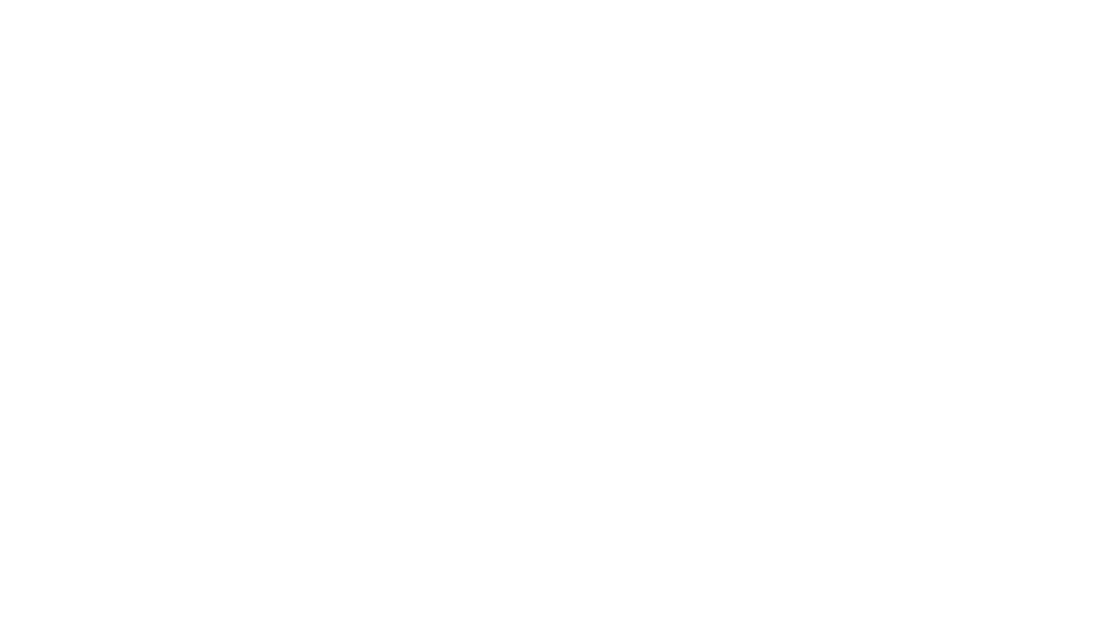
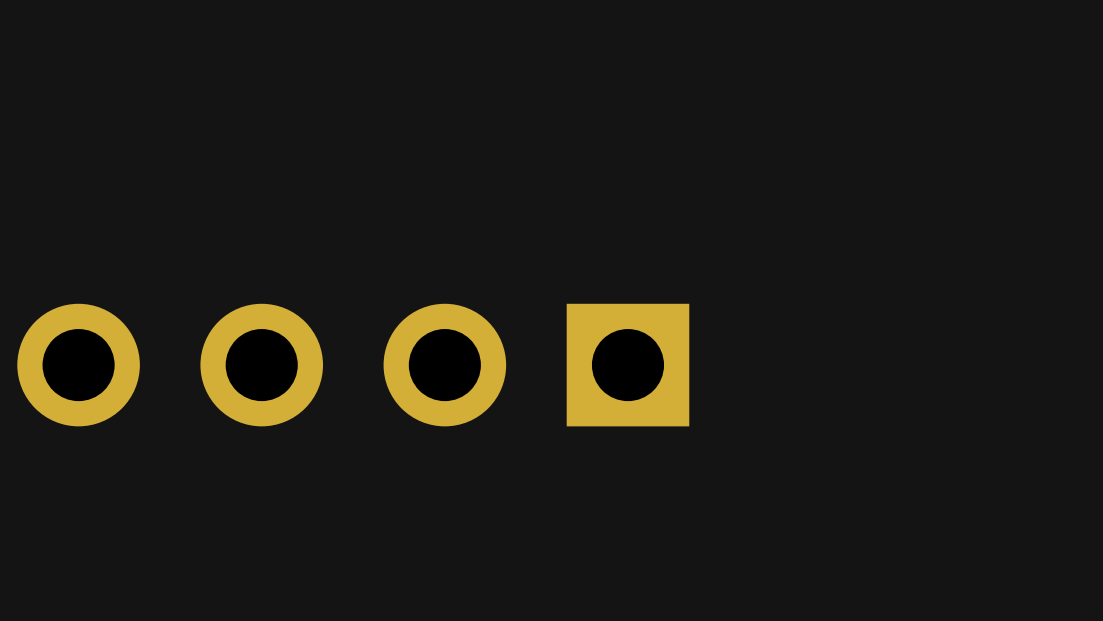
part: none -> (353, 365)

